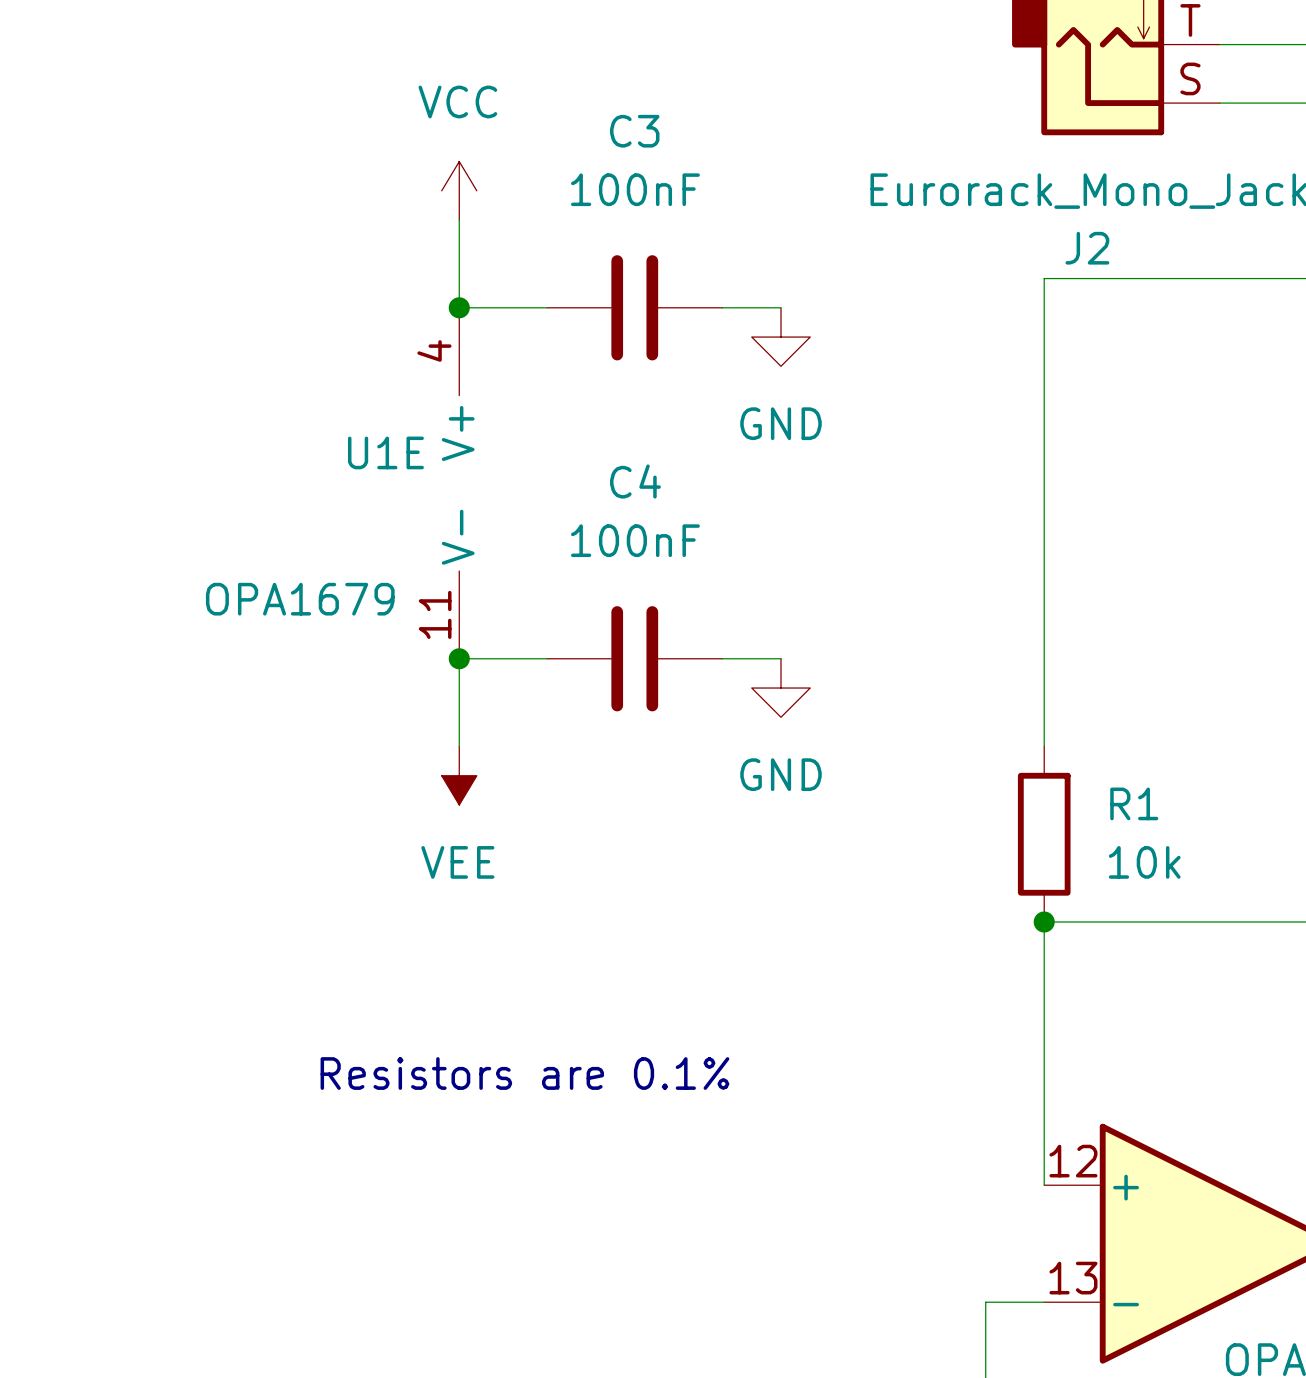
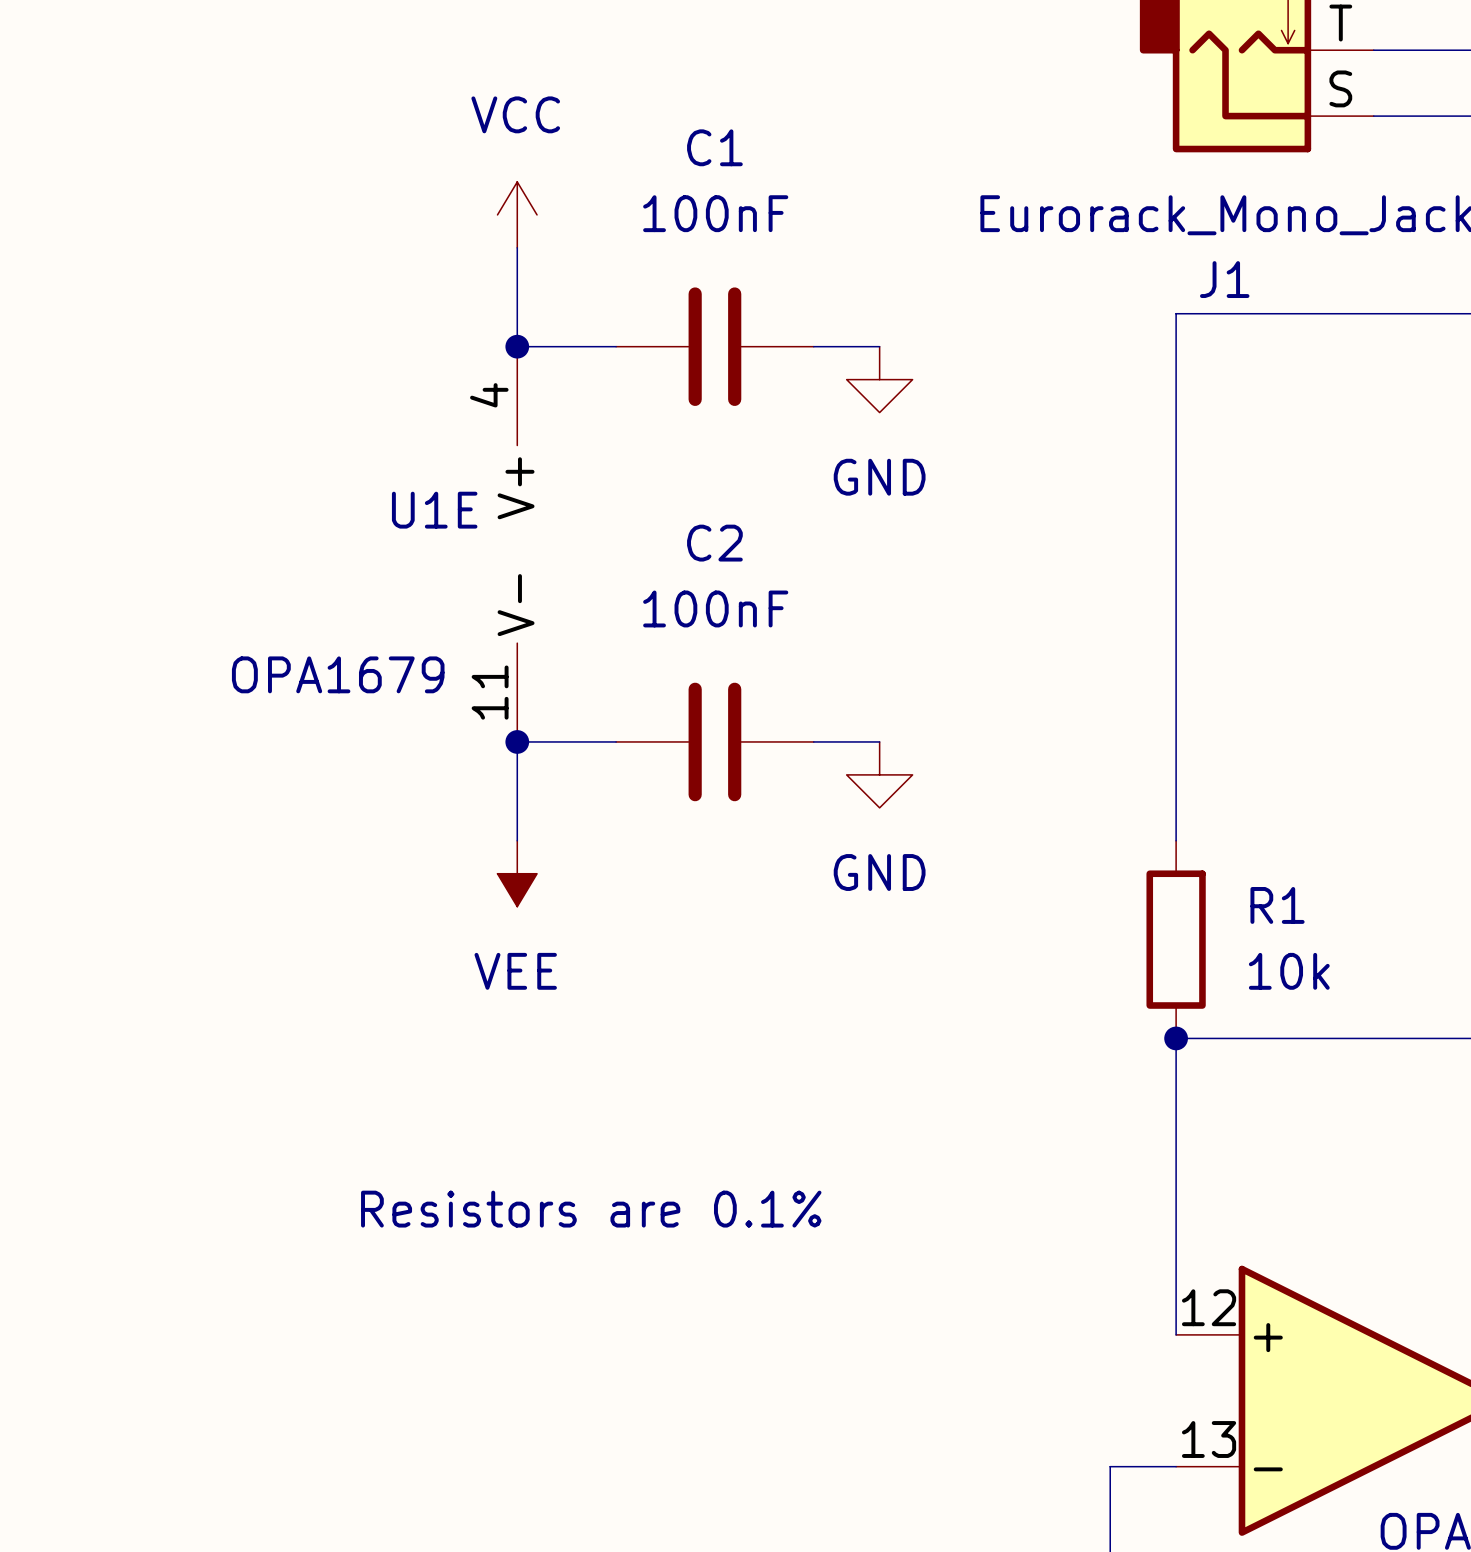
C3 name: C3 (634, 131) -> C1 (714, 147)
J2 name: J2 (1087, 248) -> J1 (1224, 279)
C4 name: C4 (635, 481) -> C2 (714, 543)

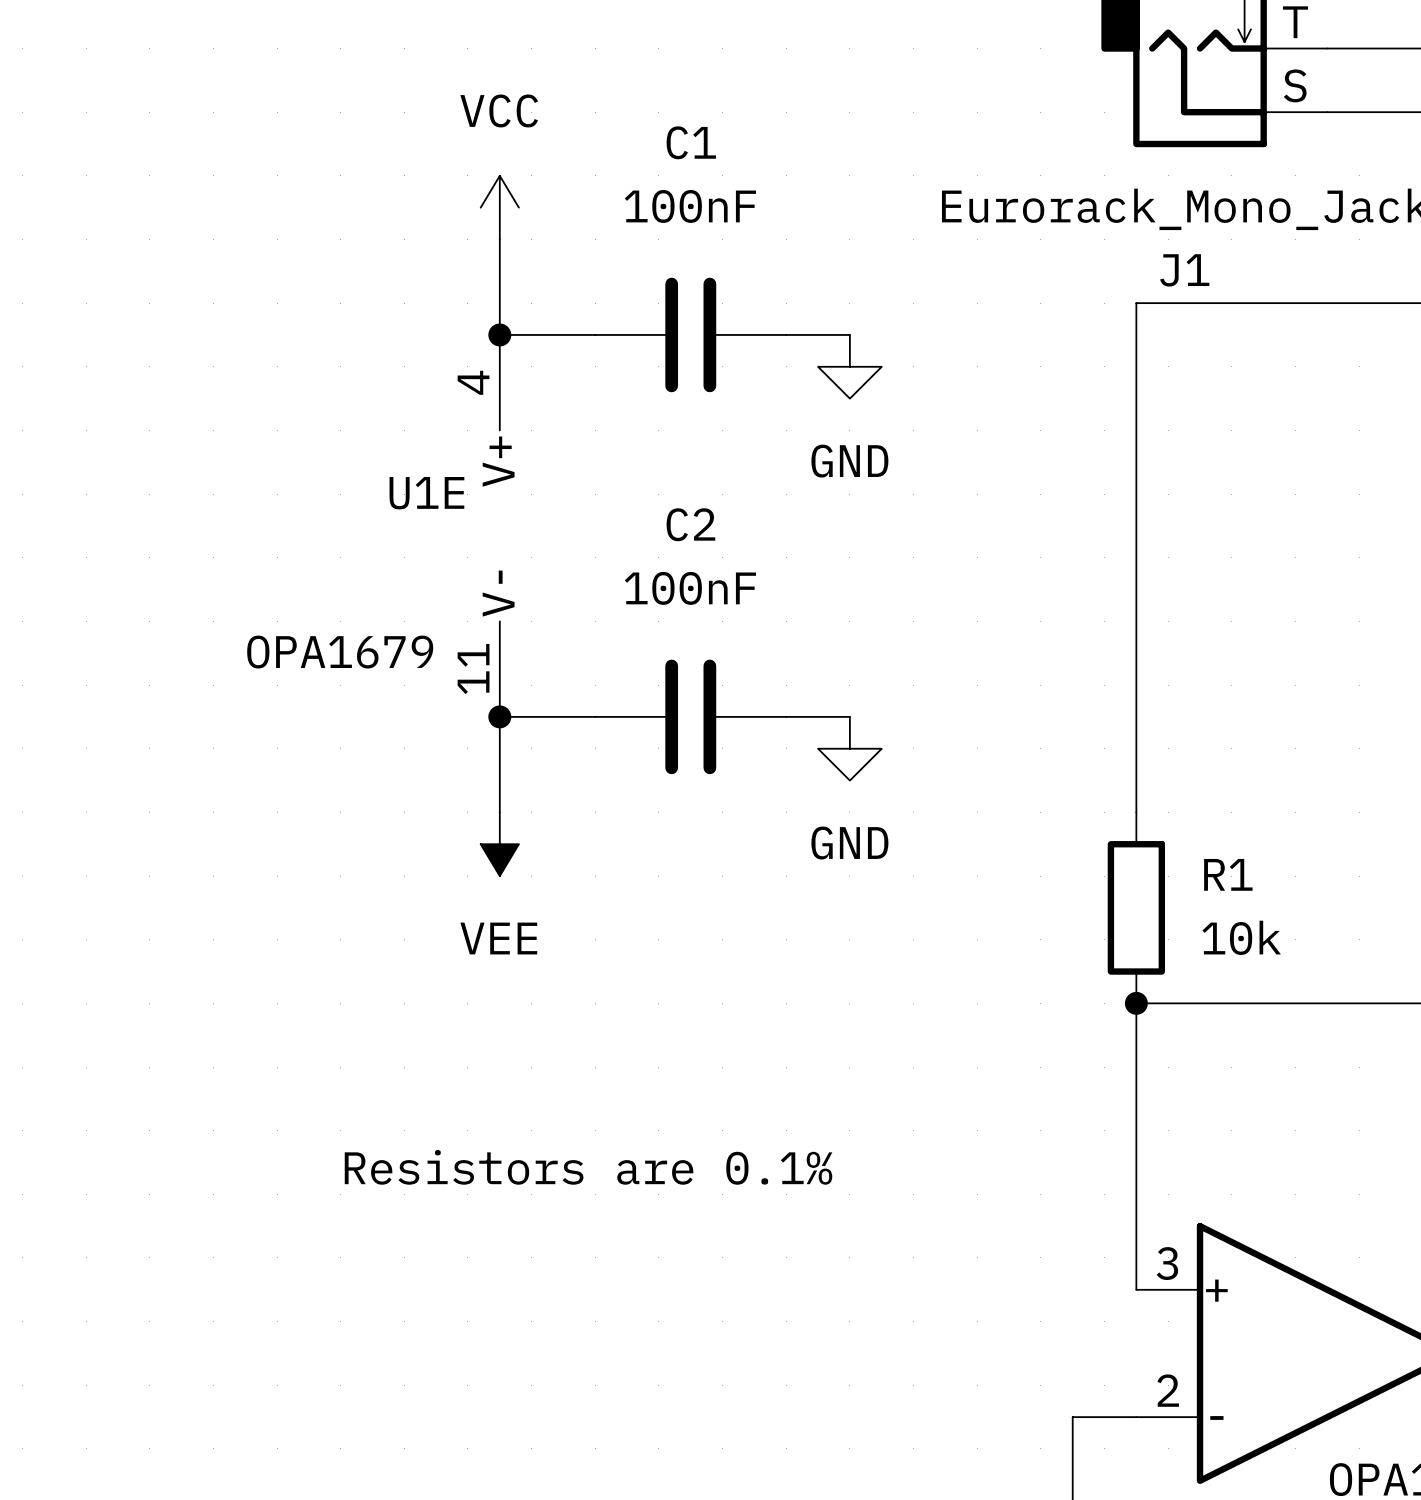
part pin number: 12 (1209, 1307) -> 3 (1167, 1263)
part pin number: 13 (1209, 1439) -> 2 (1168, 1390)

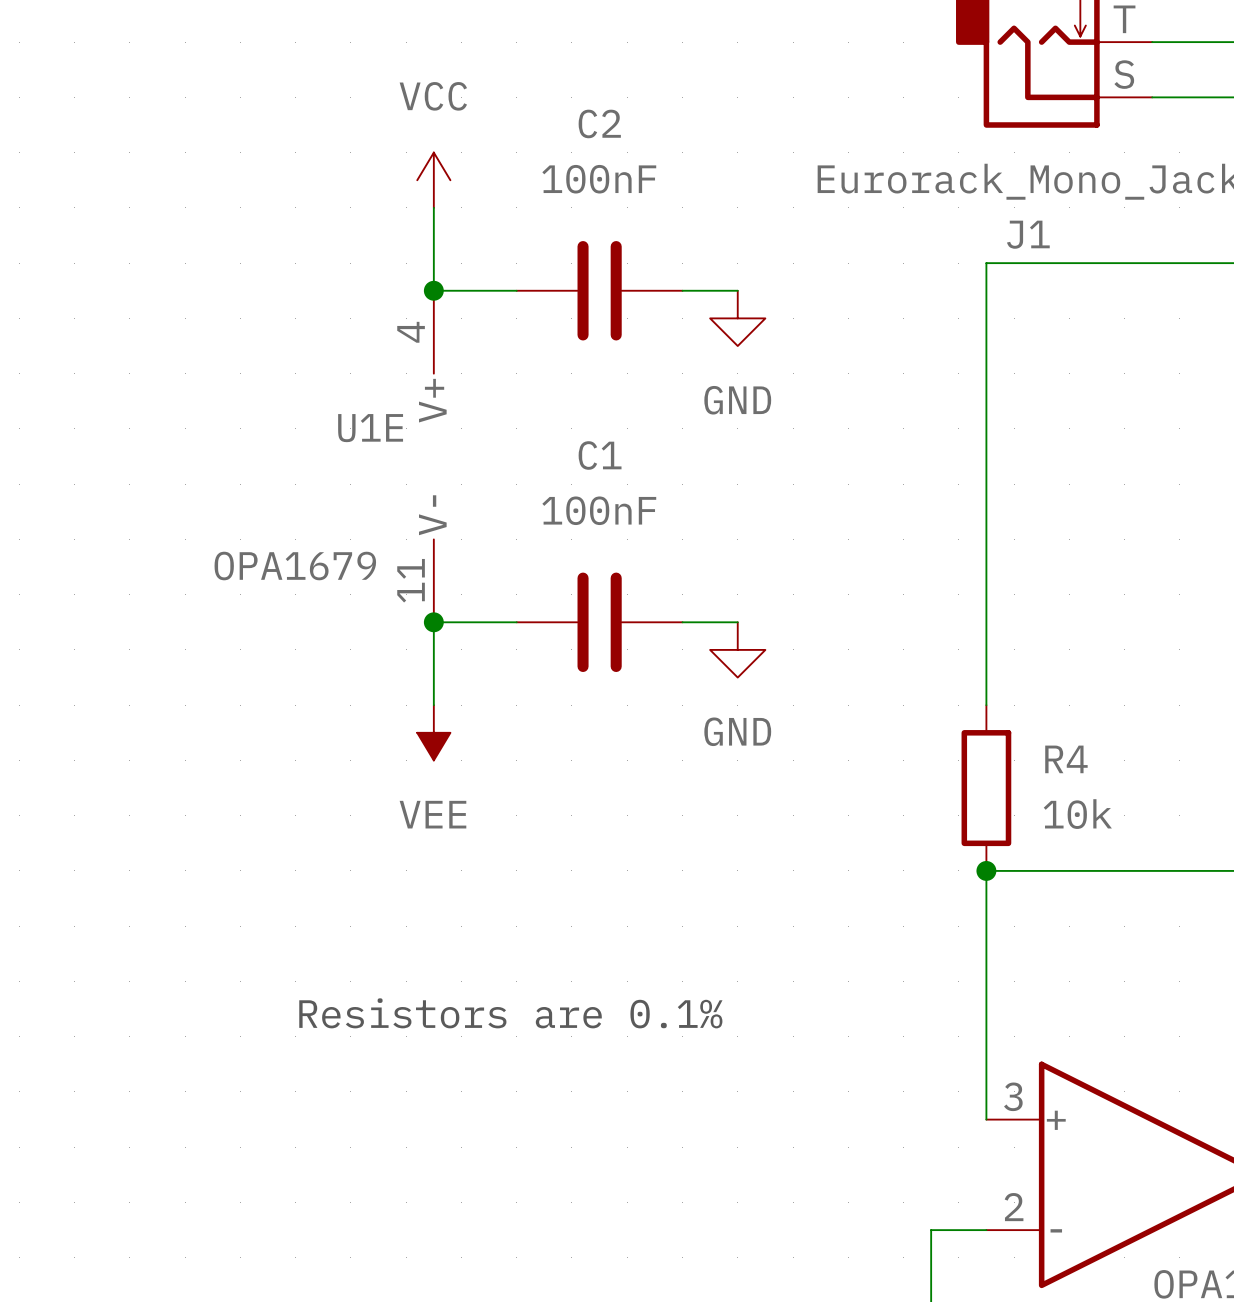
C1 name: C1 (691, 142) -> C2 (599, 123)
C2 name: C2 (690, 524) -> C1 (600, 455)
R1 name: R1 (1228, 874) -> R4 (1066, 759)

